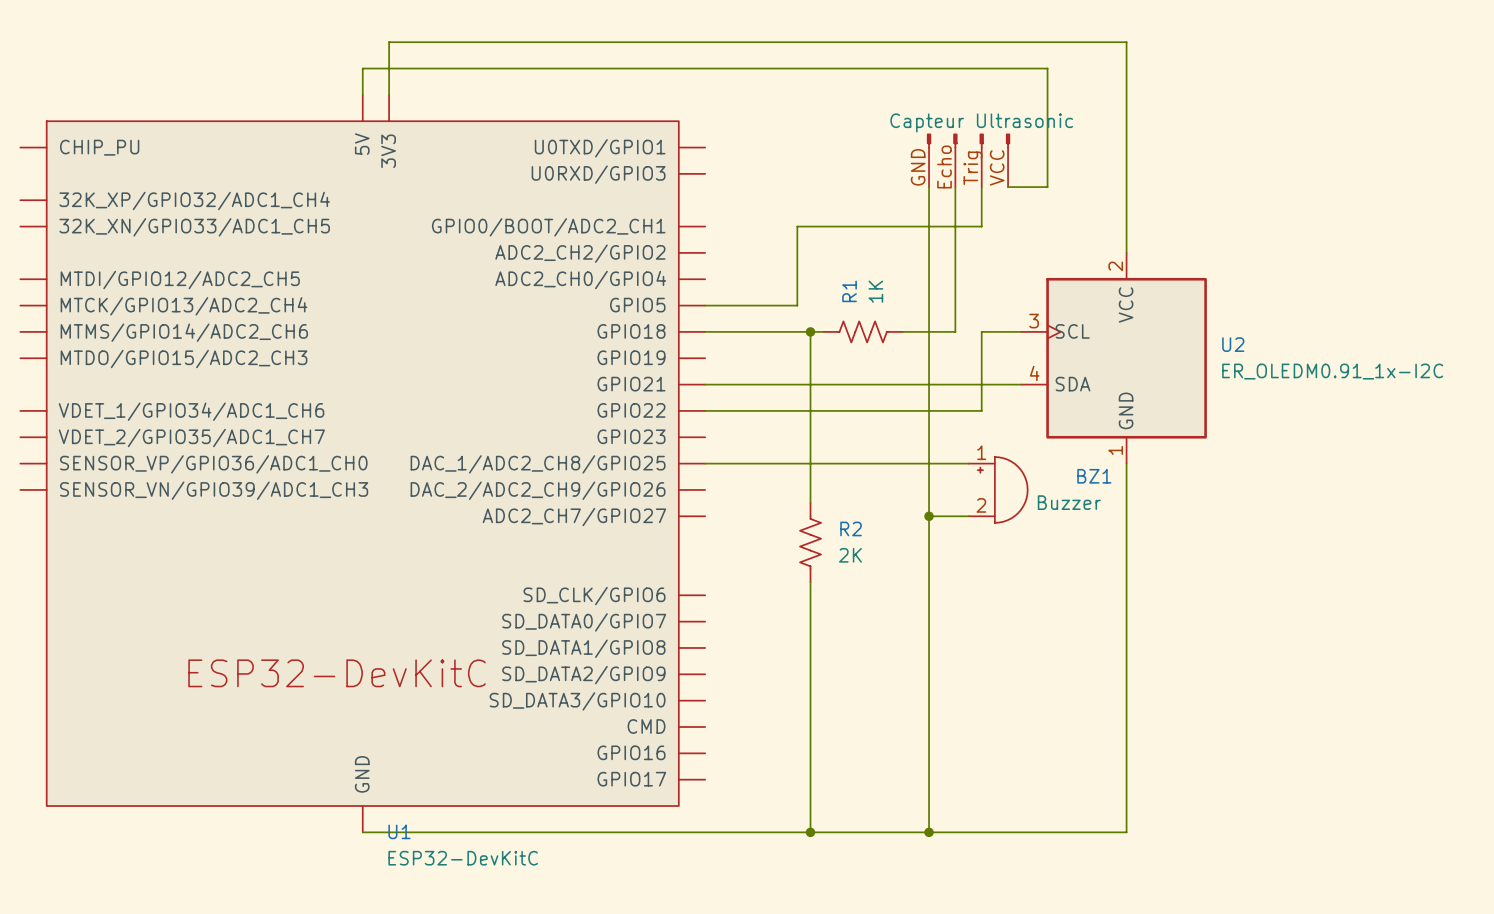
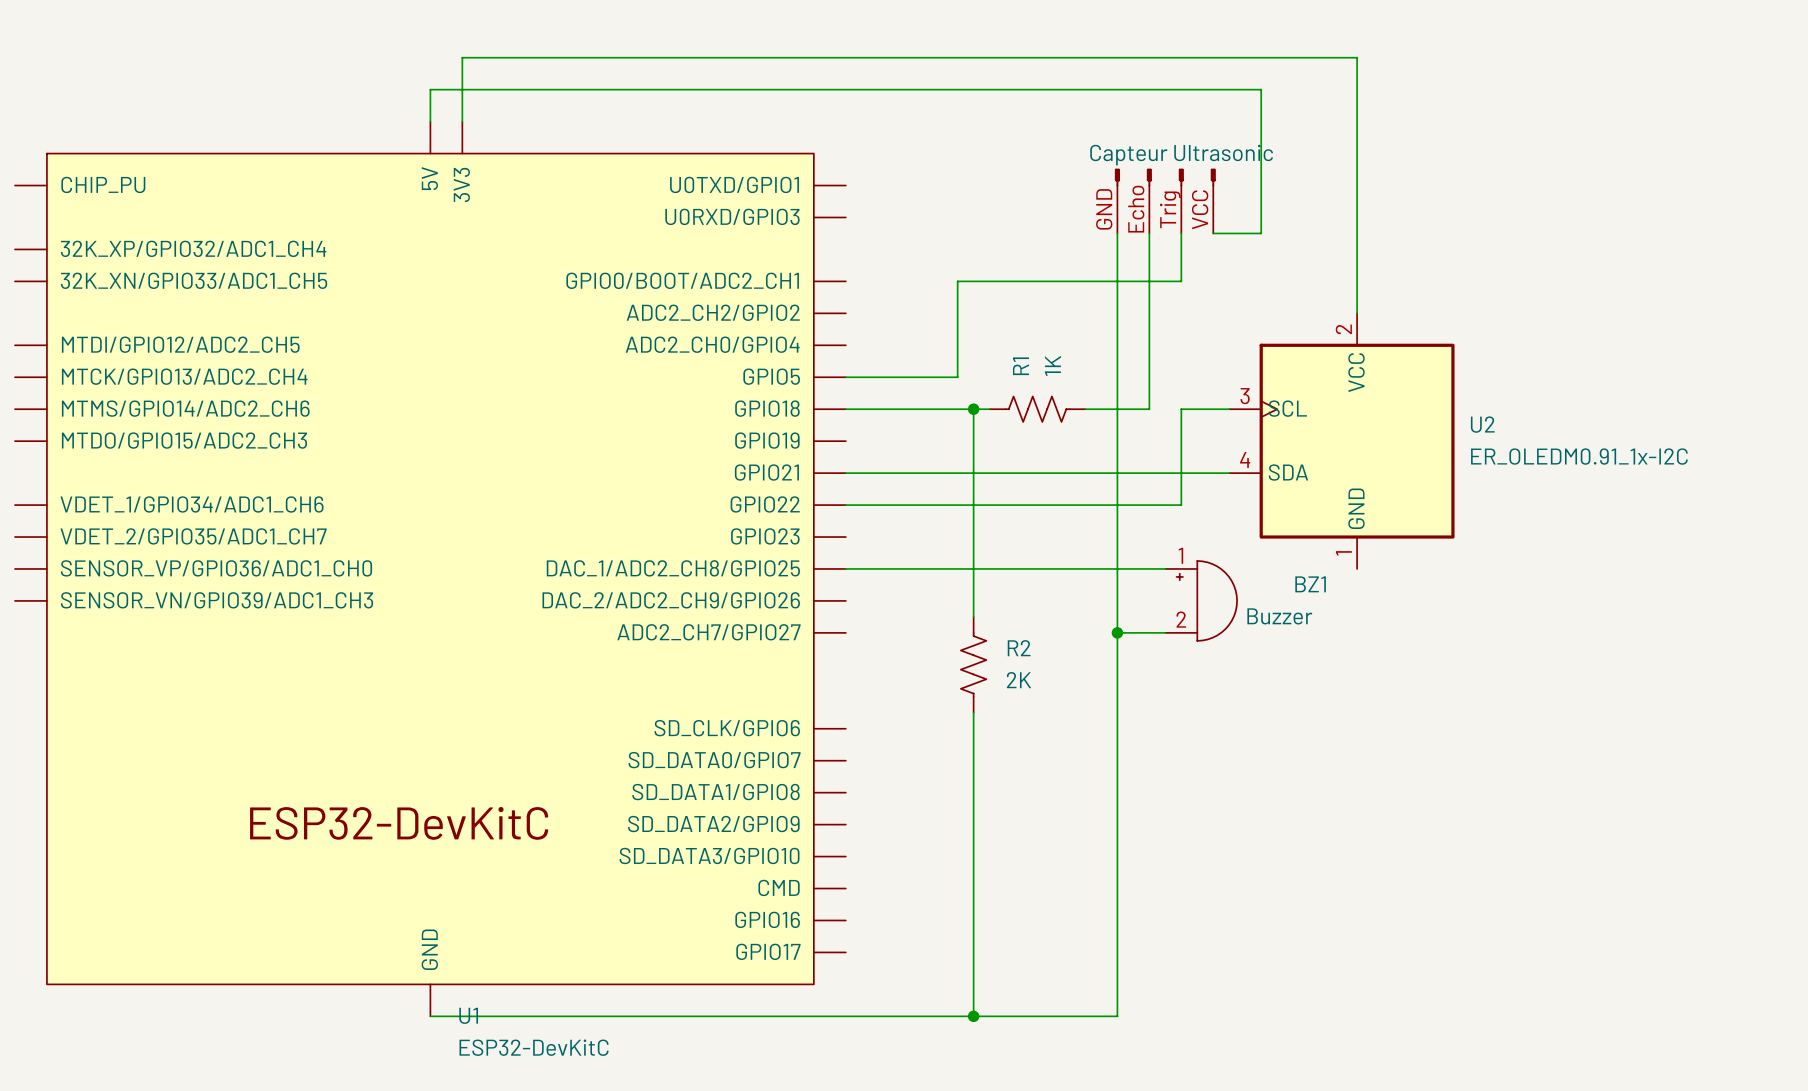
wire: (1126, 463) (1126, 832) (929, 832) -> none
junction: (929, 832) -> none

